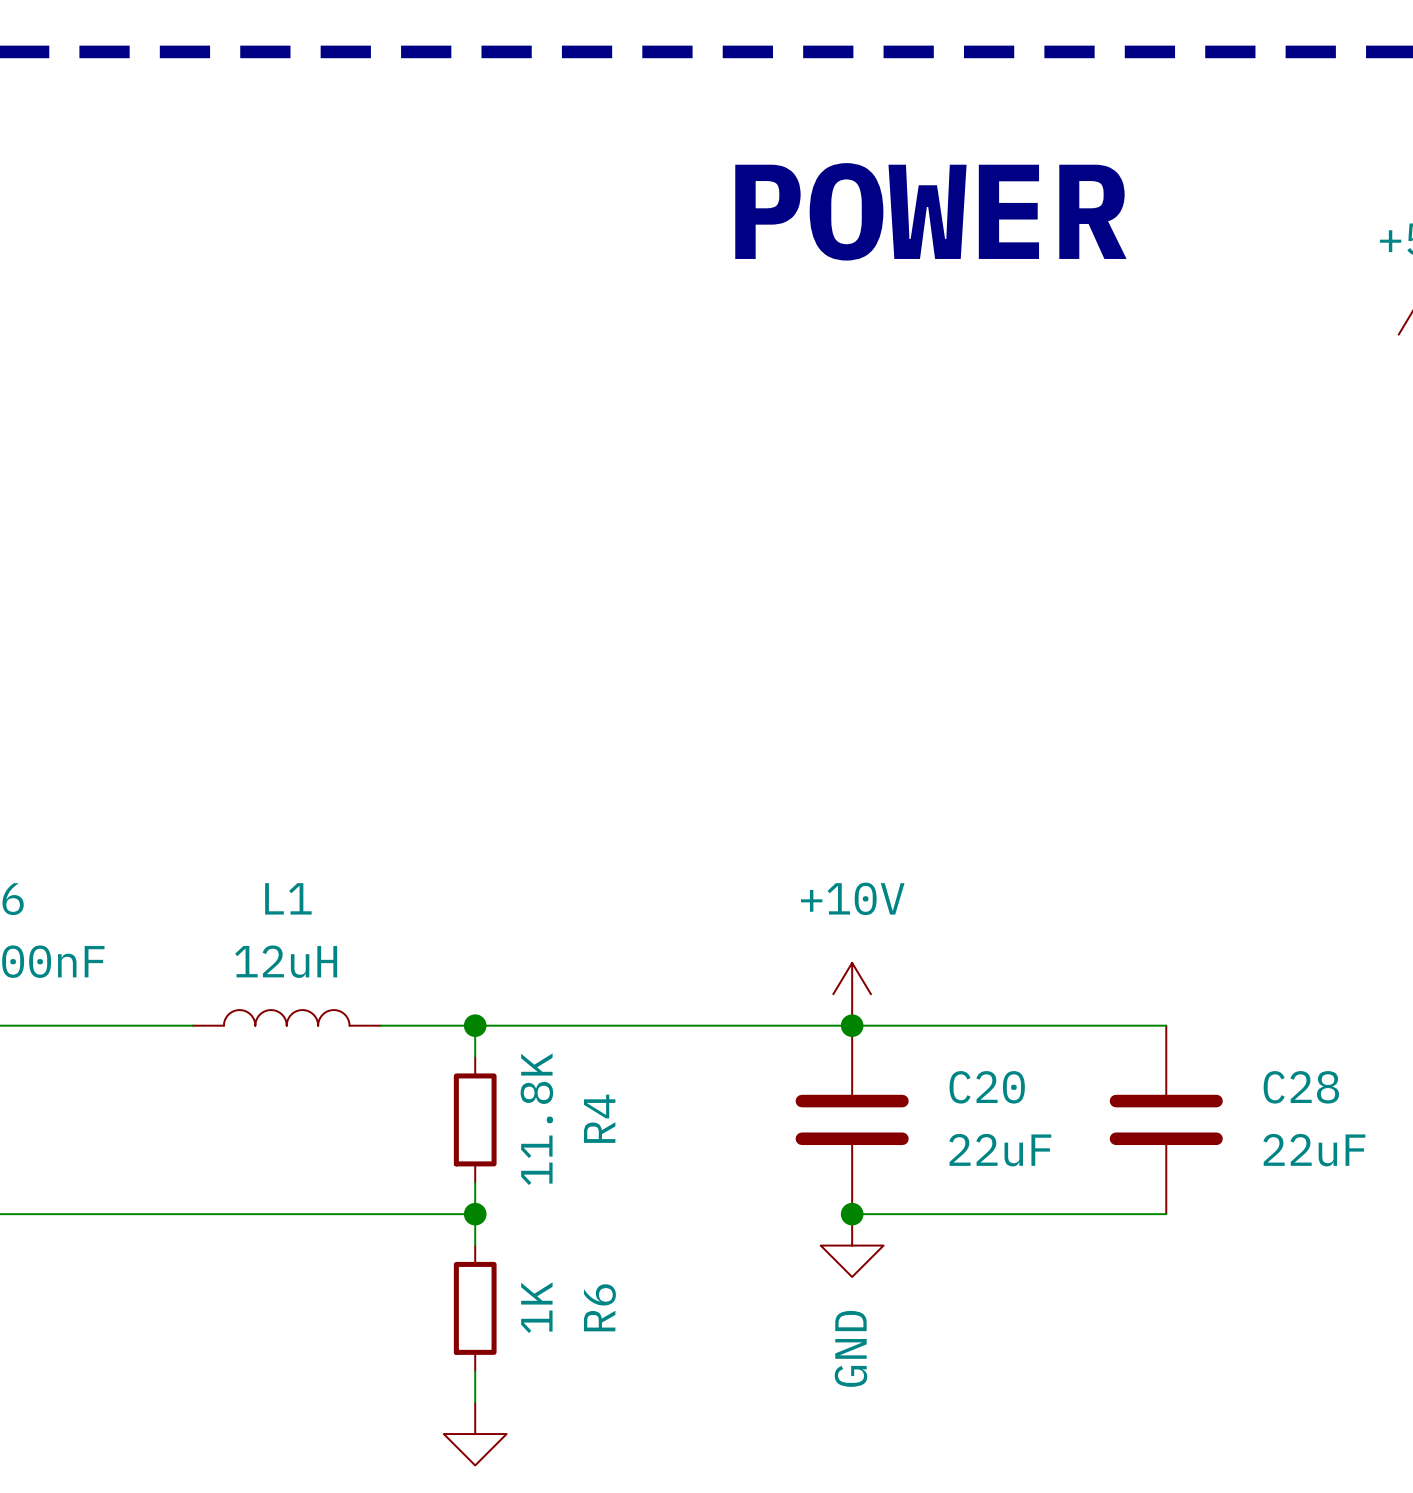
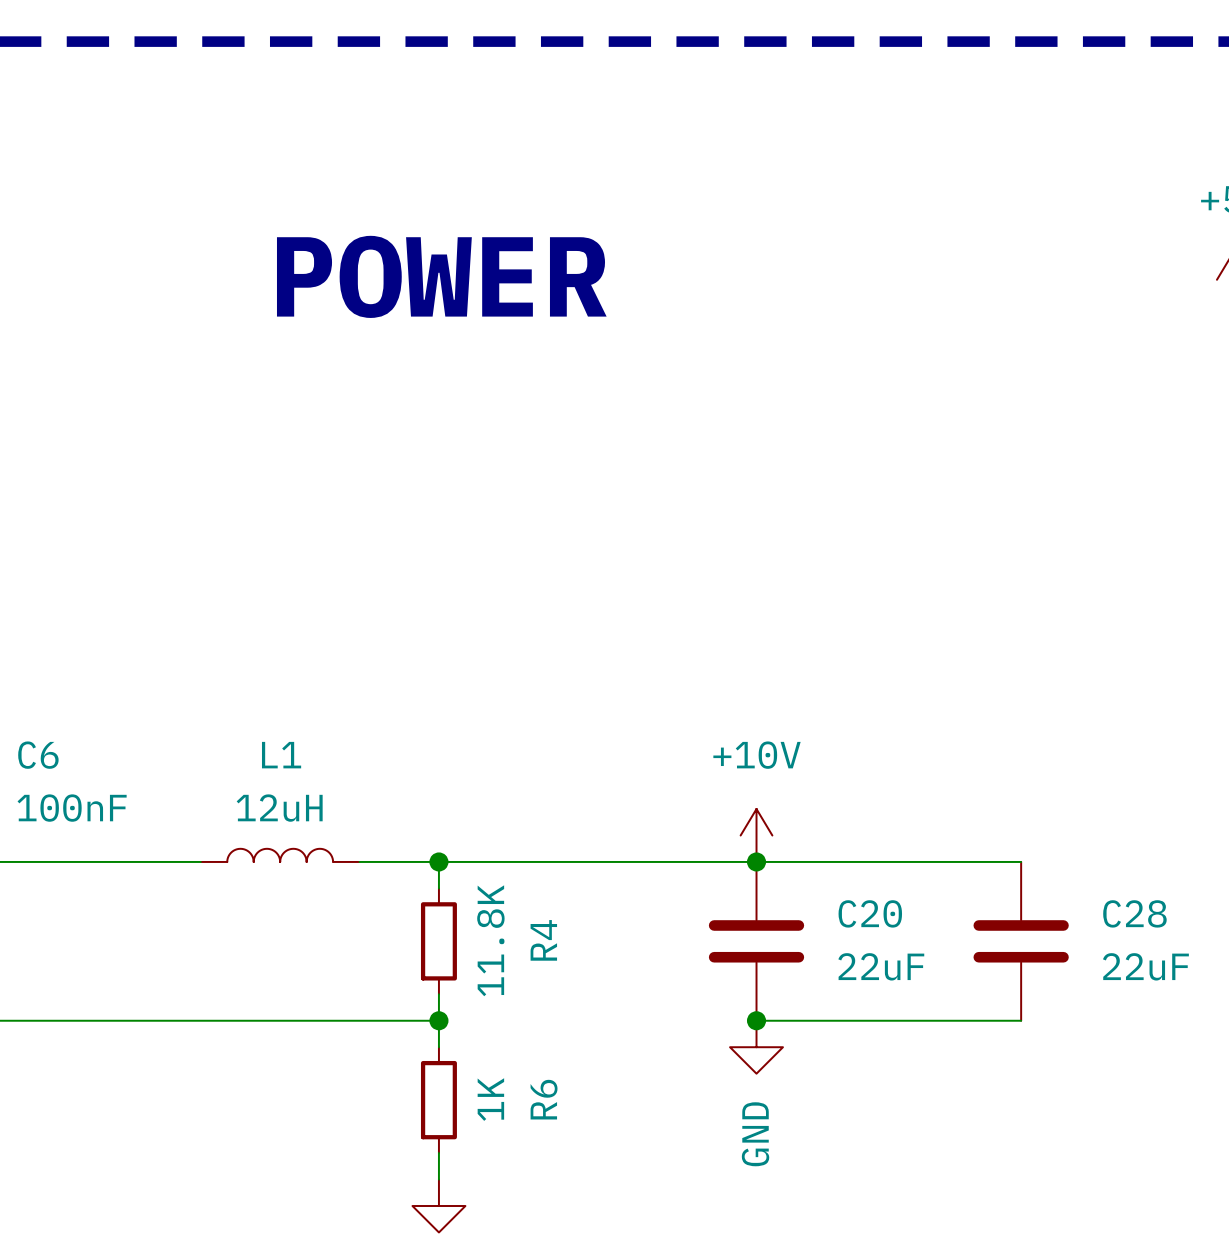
text position: POWER (930, 211) -> POWER (441, 276)

